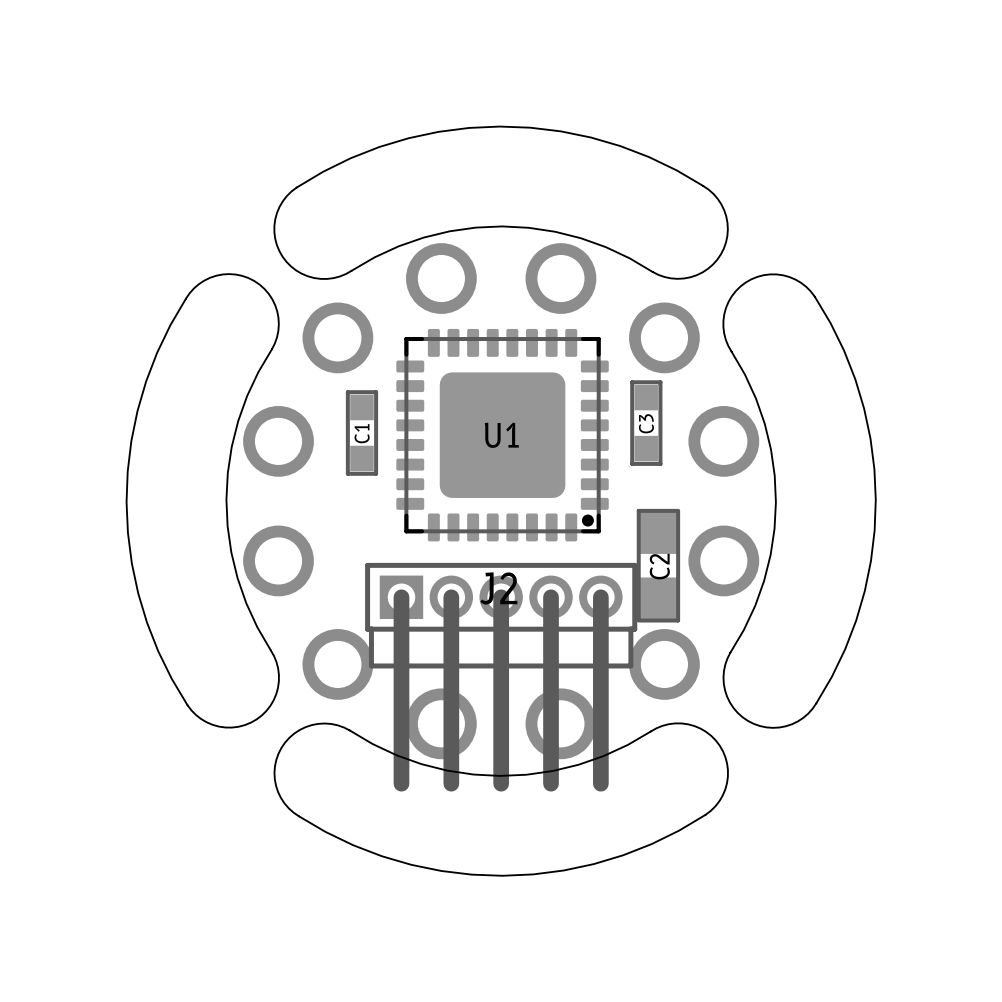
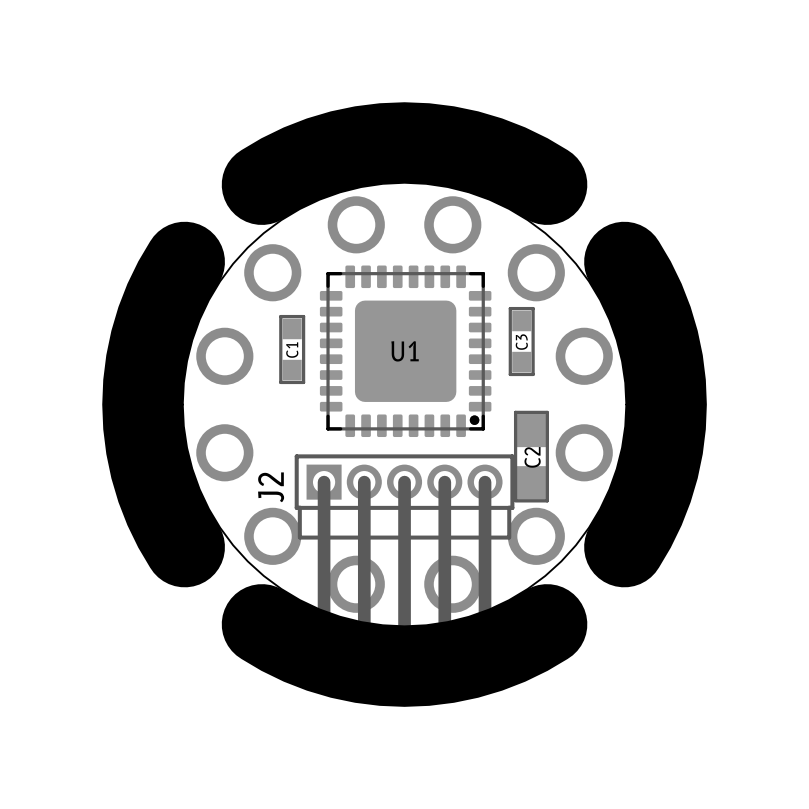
board edge: (703, 186) (713, 194) (721, 204) (726, 216) (727, 235) (720, 254) (712, 264) (702, 272) (684, 278) (671, 278) (658, 274) (629, 258) (580, 238) (528, 227) (502, 226) (449, 231) (423, 237) (374, 257) (339, 276) (320, 278) (301, 273) (286, 261) (276, 244) (274, 232) (277, 212) (286, 196) (296, 187) (323, 171) (379, 147) (438, 131) (469, 127) (530, 127) (591, 137) (649, 157) (703, 186) -> none
board edge: none -> (261, 184) (280, 173) (319, 156) (361, 146) (404, 142) (447, 146) (489, 156) (528, 173) (547, 184)
board edge: (814, 296) (801, 282) (789, 277) (776, 274) (757, 276) (740, 286) (731, 296) (726, 307) (723, 320) (725, 339) (744, 374) (764, 423) (771, 449) (775, 502) (774, 528) (764, 580) (743, 629) (727, 658) (723, 671) (723, 684) (729, 702) (737, 712) (748, 720) (766, 727) (785, 726) (803, 717) (812, 708) (831, 676) (856, 620) (864, 591) (874, 530) (874, 469) (864, 408) (844, 350) (814, 296) -> none
board edge: (186, 298) (194, 288) (204, 280) (216, 275) (235, 274) (254, 280) (264, 289) (272, 299) (278, 317) (278, 330) (274, 343) (258, 372) (238, 421) (227, 473) (226, 499) (231, 552) (237, 578) (257, 627) (276, 662) (278, 681) (273, 700) (261, 715) (244, 725) (232, 727) (212, 724) (196, 715) (187, 705) (171, 678) (147, 622) (131, 563) (127, 532) (127, 471) (137, 410) (157, 352) (186, 298) -> none
board edge: none -> (184, 261) (173, 280) (156, 319) (146, 361) (142, 404) (146, 447) (156, 489) (173, 528) (184, 547)
board edge: none -> (624, 261) (635, 280) (652, 319) (663, 361) (666, 404) (663, 447) (652, 489) (635, 528) (624, 547)
board edge: none -> (182, 404) (187, 361) (199, 319) (220, 281) (247, 247) (281, 220) (319, 199) (361, 187) (404, 182) (447, 187) (489, 199) (527, 220) (561, 247) (588, 281) (609, 319) (622, 361) (626, 404) (622, 447) (609, 489) (588, 527) (561, 561) (527, 588) (489, 609) (447, 622) (404, 626) (361, 622) (319, 609) (281, 588) (247, 561) (220, 527) (199, 489) (187, 447) (182, 404)
J2 name rotation: 0° (498, 588) -> 90° counterclockwise (271, 487)
J2 name position: J2 (498, 588) -> J2 (271, 487)
board edge: (349, 730) (331, 723) (318, 723) (299, 729) (289, 737) (281, 748) (274, 766) (276, 785) (280, 797) (288, 808) (299, 816) (353, 845) (411, 864) (441, 870) (502, 875) (533, 874) (563, 870) (623, 855) (679, 830) (705, 814) (719, 801) (725, 789) (727, 776) (725, 757) (715, 740) (700, 728) (681, 723) (662, 725) (627, 744) (578, 764) (552, 771) (500, 775) (473, 774) (421, 764) (396, 755) (349, 730) -> none
board edge: none -> (261, 624) (280, 635) (319, 652) (361, 663) (404, 666) (447, 663) (489, 652) (528, 635) (547, 624)

